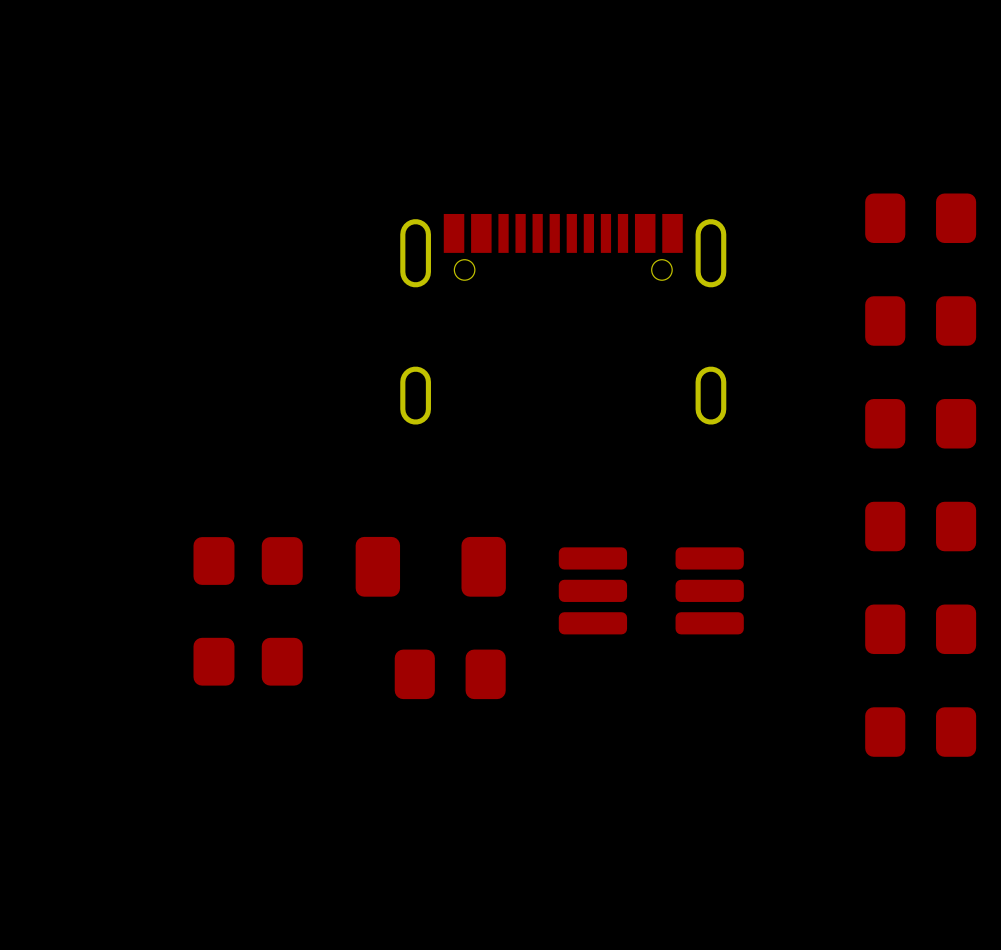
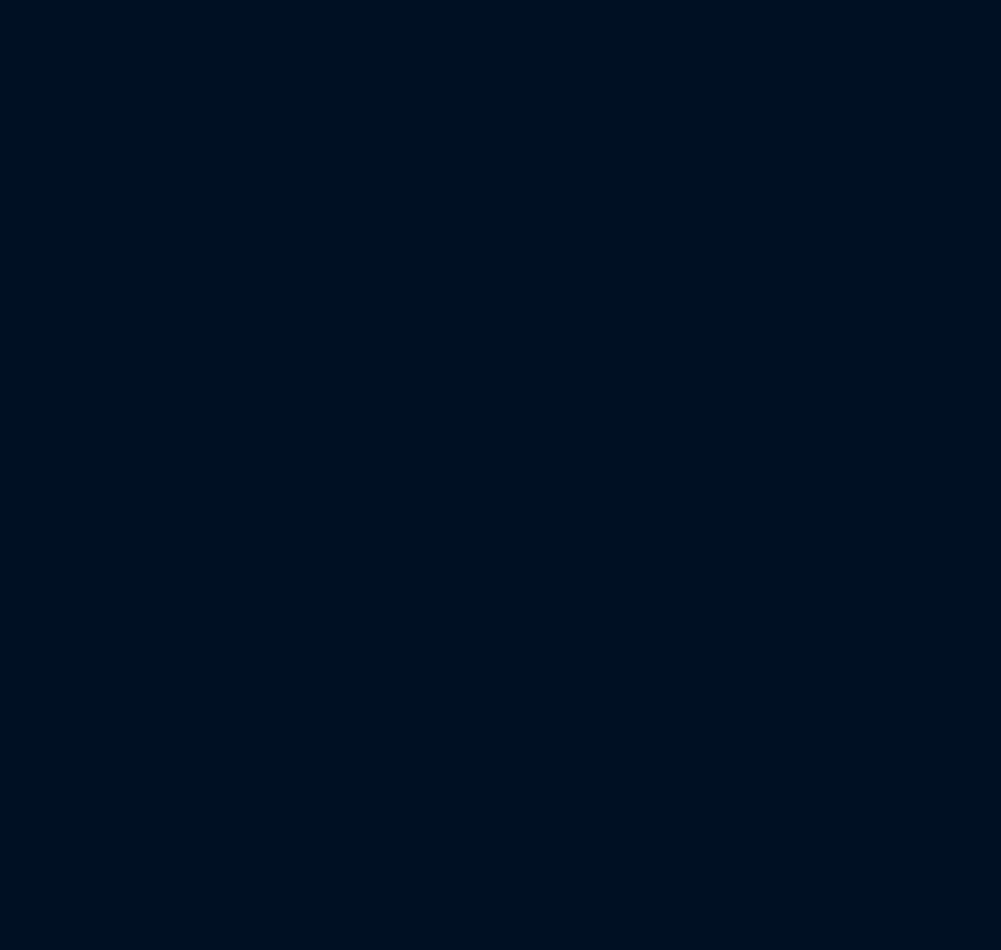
part: (920, 218) -> none
part: (563, 319) -> none
part: (920, 321) -> none
part: (920, 423) -> none
part: (920, 526) -> none
part: (248, 561) -> none
part: (430, 566) -> none
part: (651, 590) -> none
part: (920, 629) -> none
part: (248, 661) -> none
part: (450, 674) -> none
part: (920, 732) -> none

